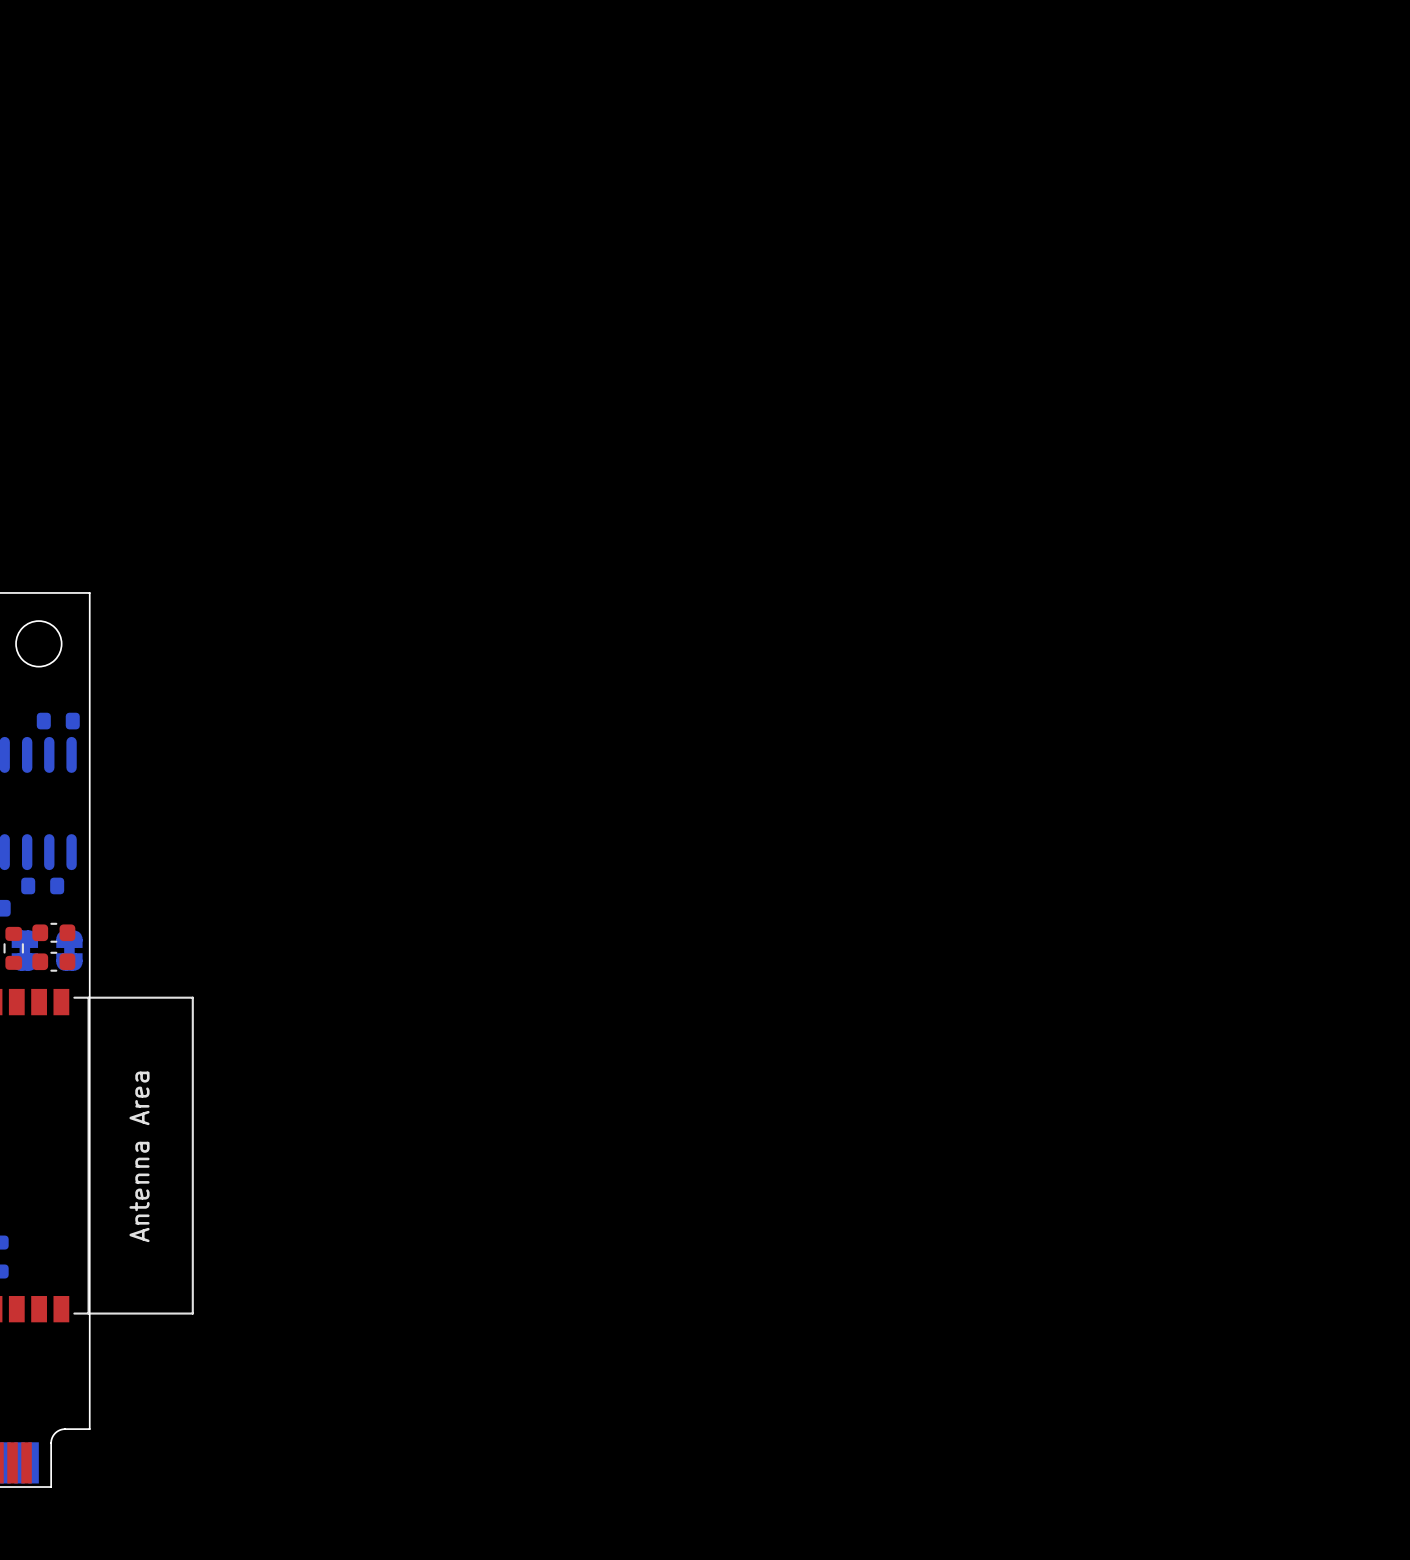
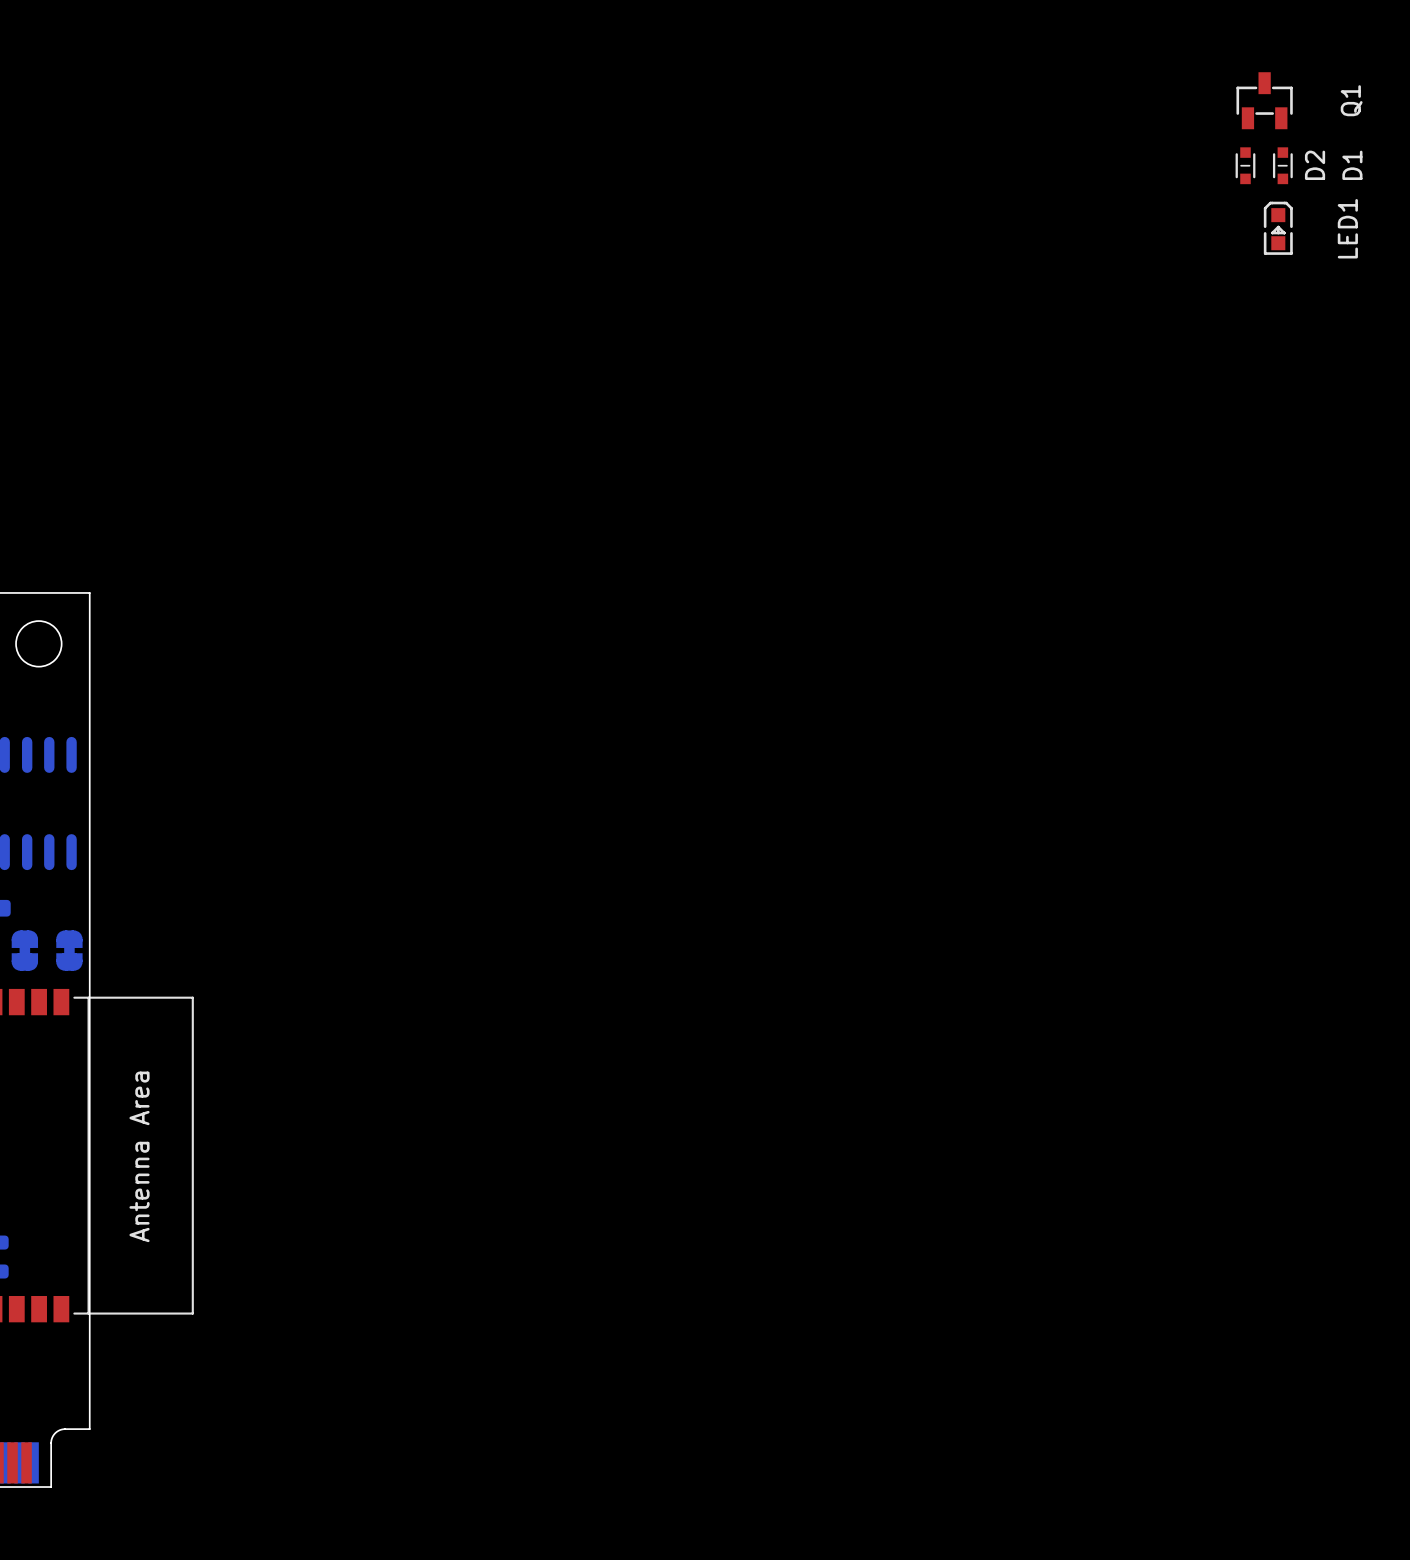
Q1: none -> (1264, 100)
D2: none -> (1245, 165)
D1: none -> (1282, 165)
LED1: none -> (1278, 228)
part: (58, 721) -> none
part: (42, 885) -> none
part: (53, 932) -> none
part: (13, 948) -> none
part: (53, 961) -> none

